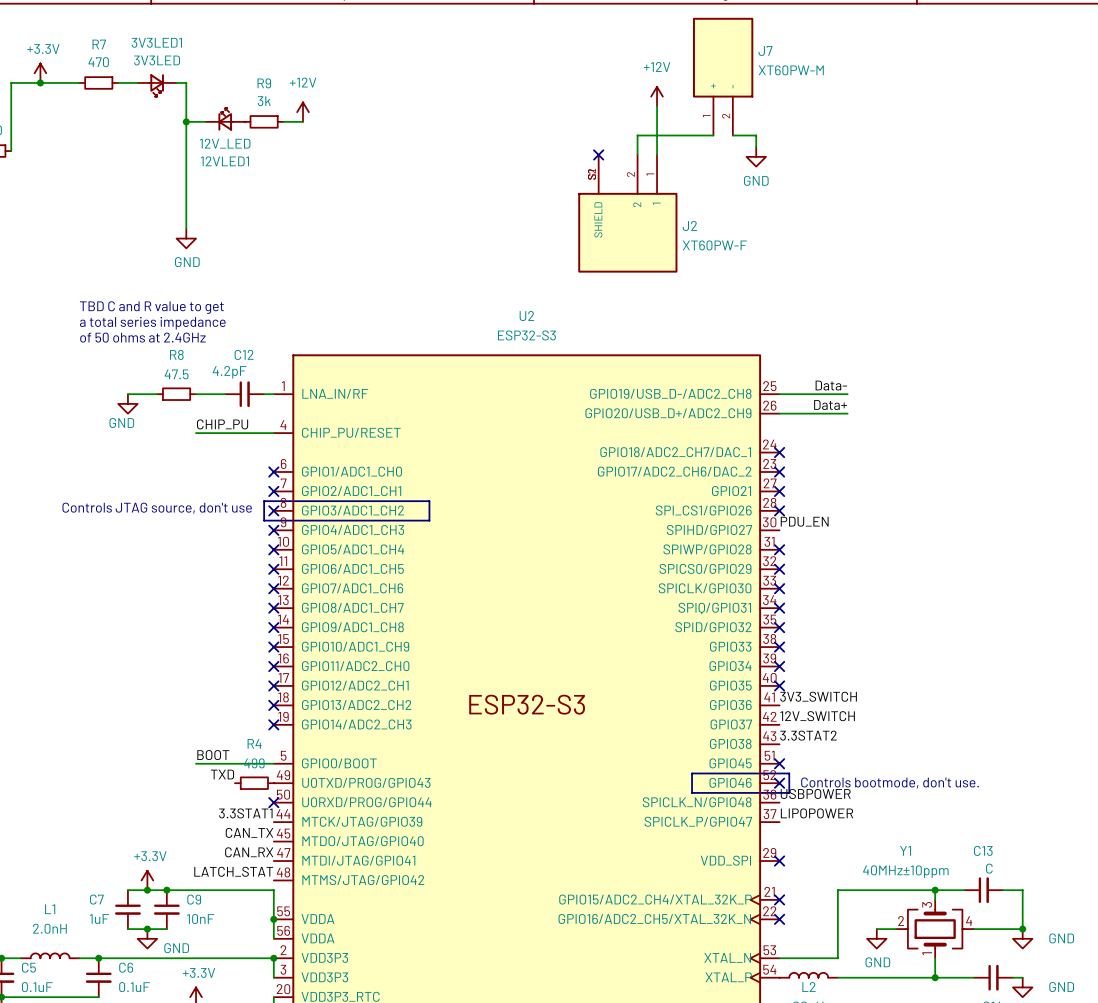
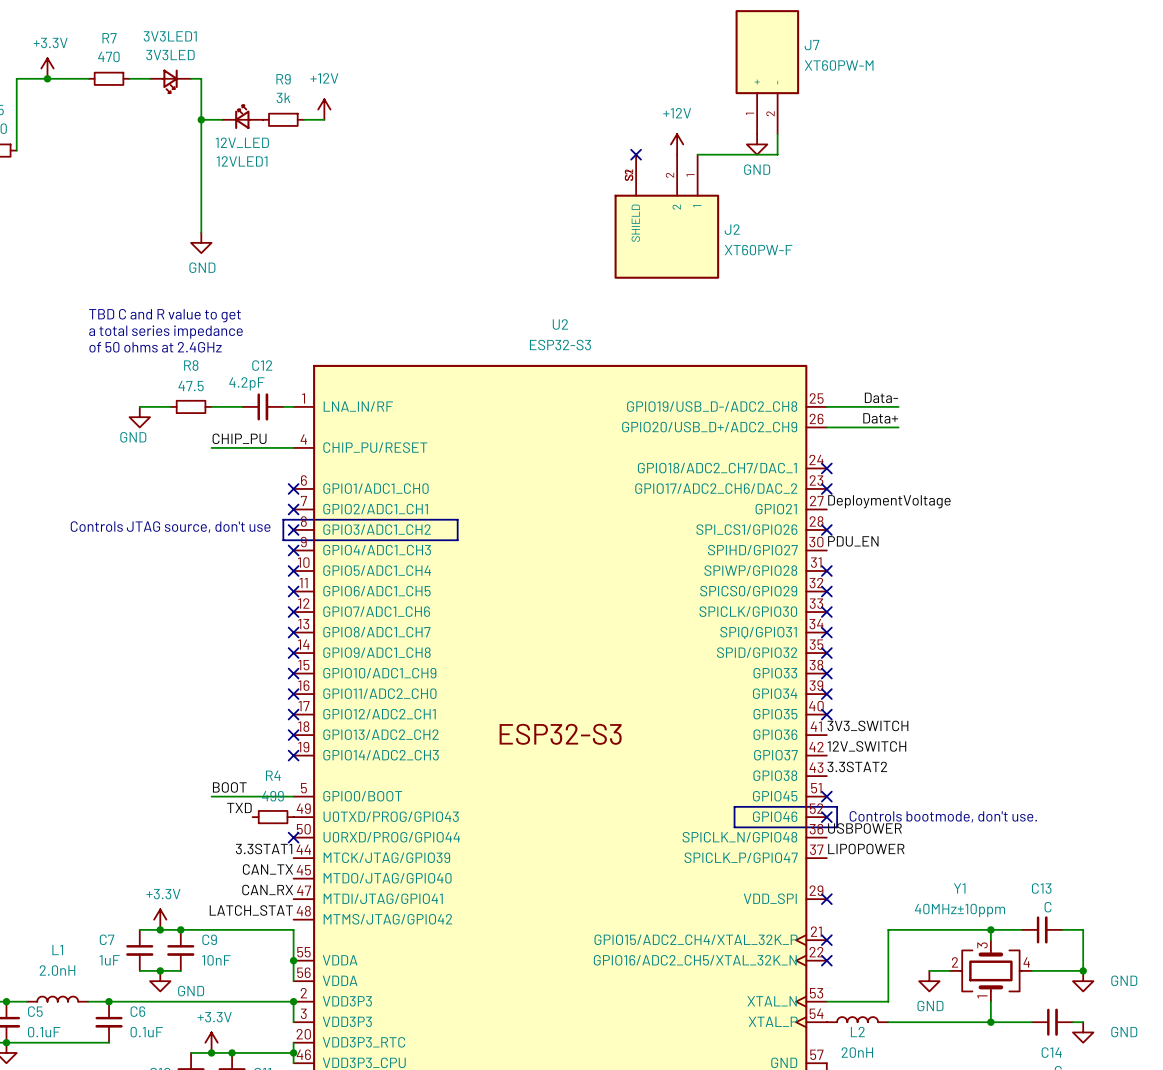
power symbol position: +12V (657, 96) -> +12V (677, 144)
wire: (657, 106) (657, 154) -> (777, 134) (777, 154) (697, 154)
wire: (713, 135) (637, 135) (637, 154) -> none
wire: (732, 135) (756, 135) (756, 147) -> none
power symbol position: GND (756, 156) -> GND (757, 144)
label: none -> DeploymentVoltage (889, 501)
no-connect mark: (779, 491) -> none

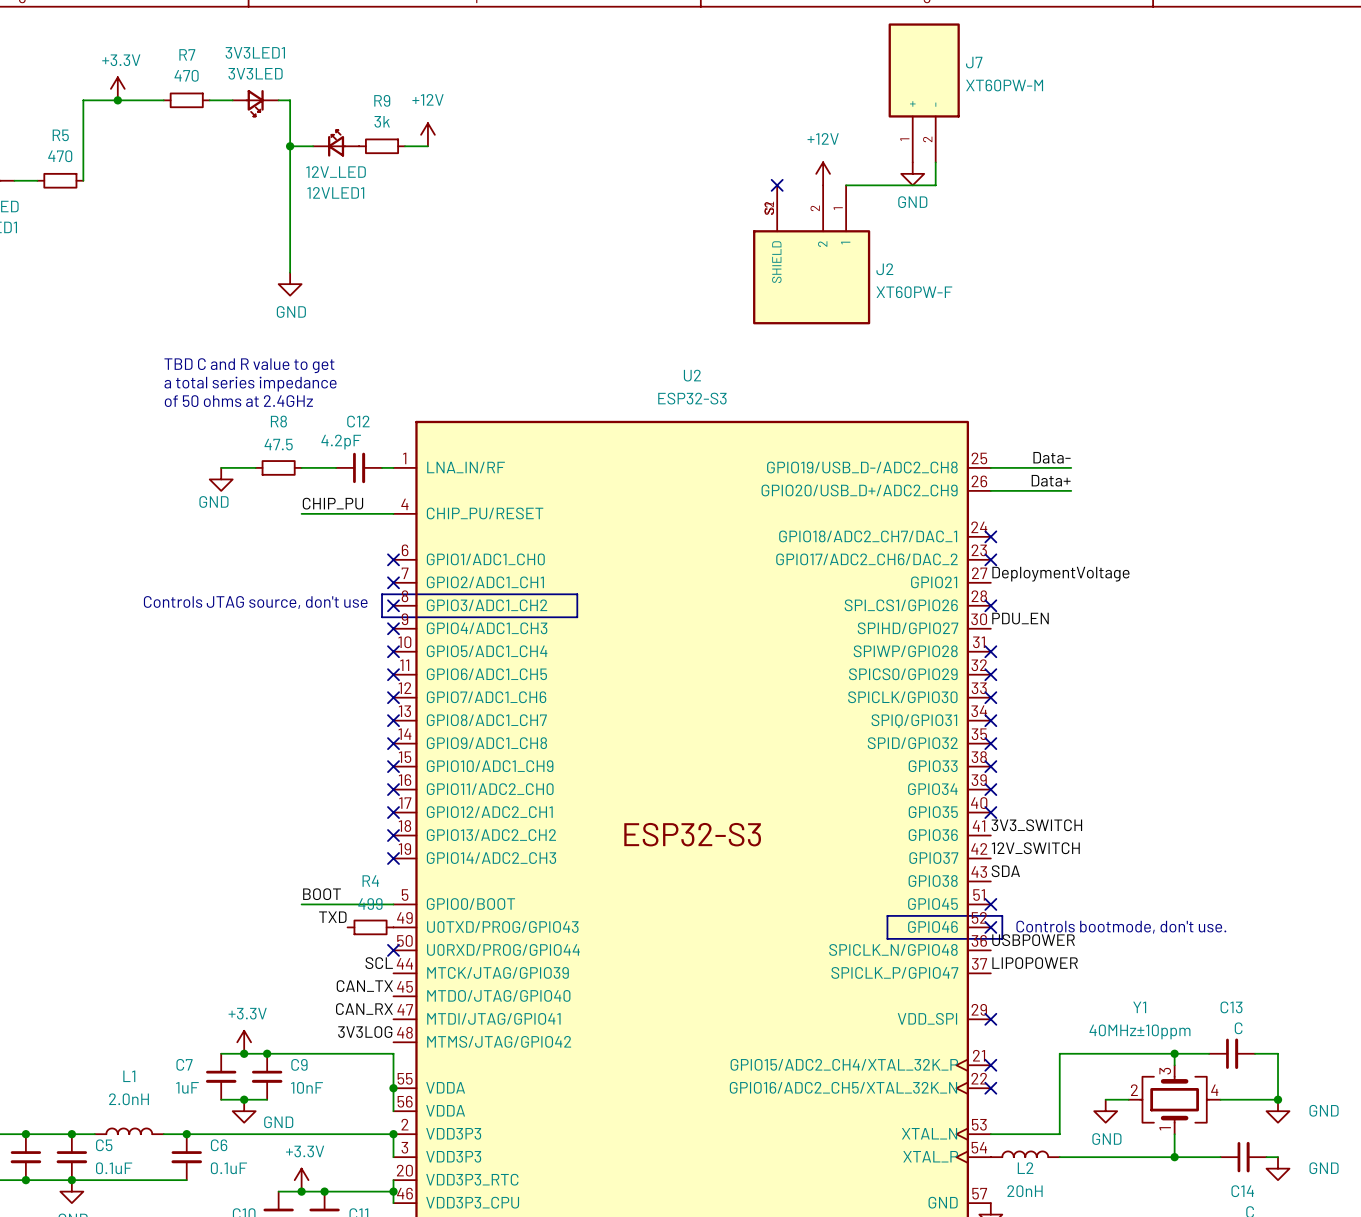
label: 3.3STAT2 (857, 766) -> SDA (1005, 871)
label: 3.3STAT1 (264, 848) -> SCL (379, 963)
label: LATCH_STAT (251, 910) -> 3V3LOG (365, 1032)

